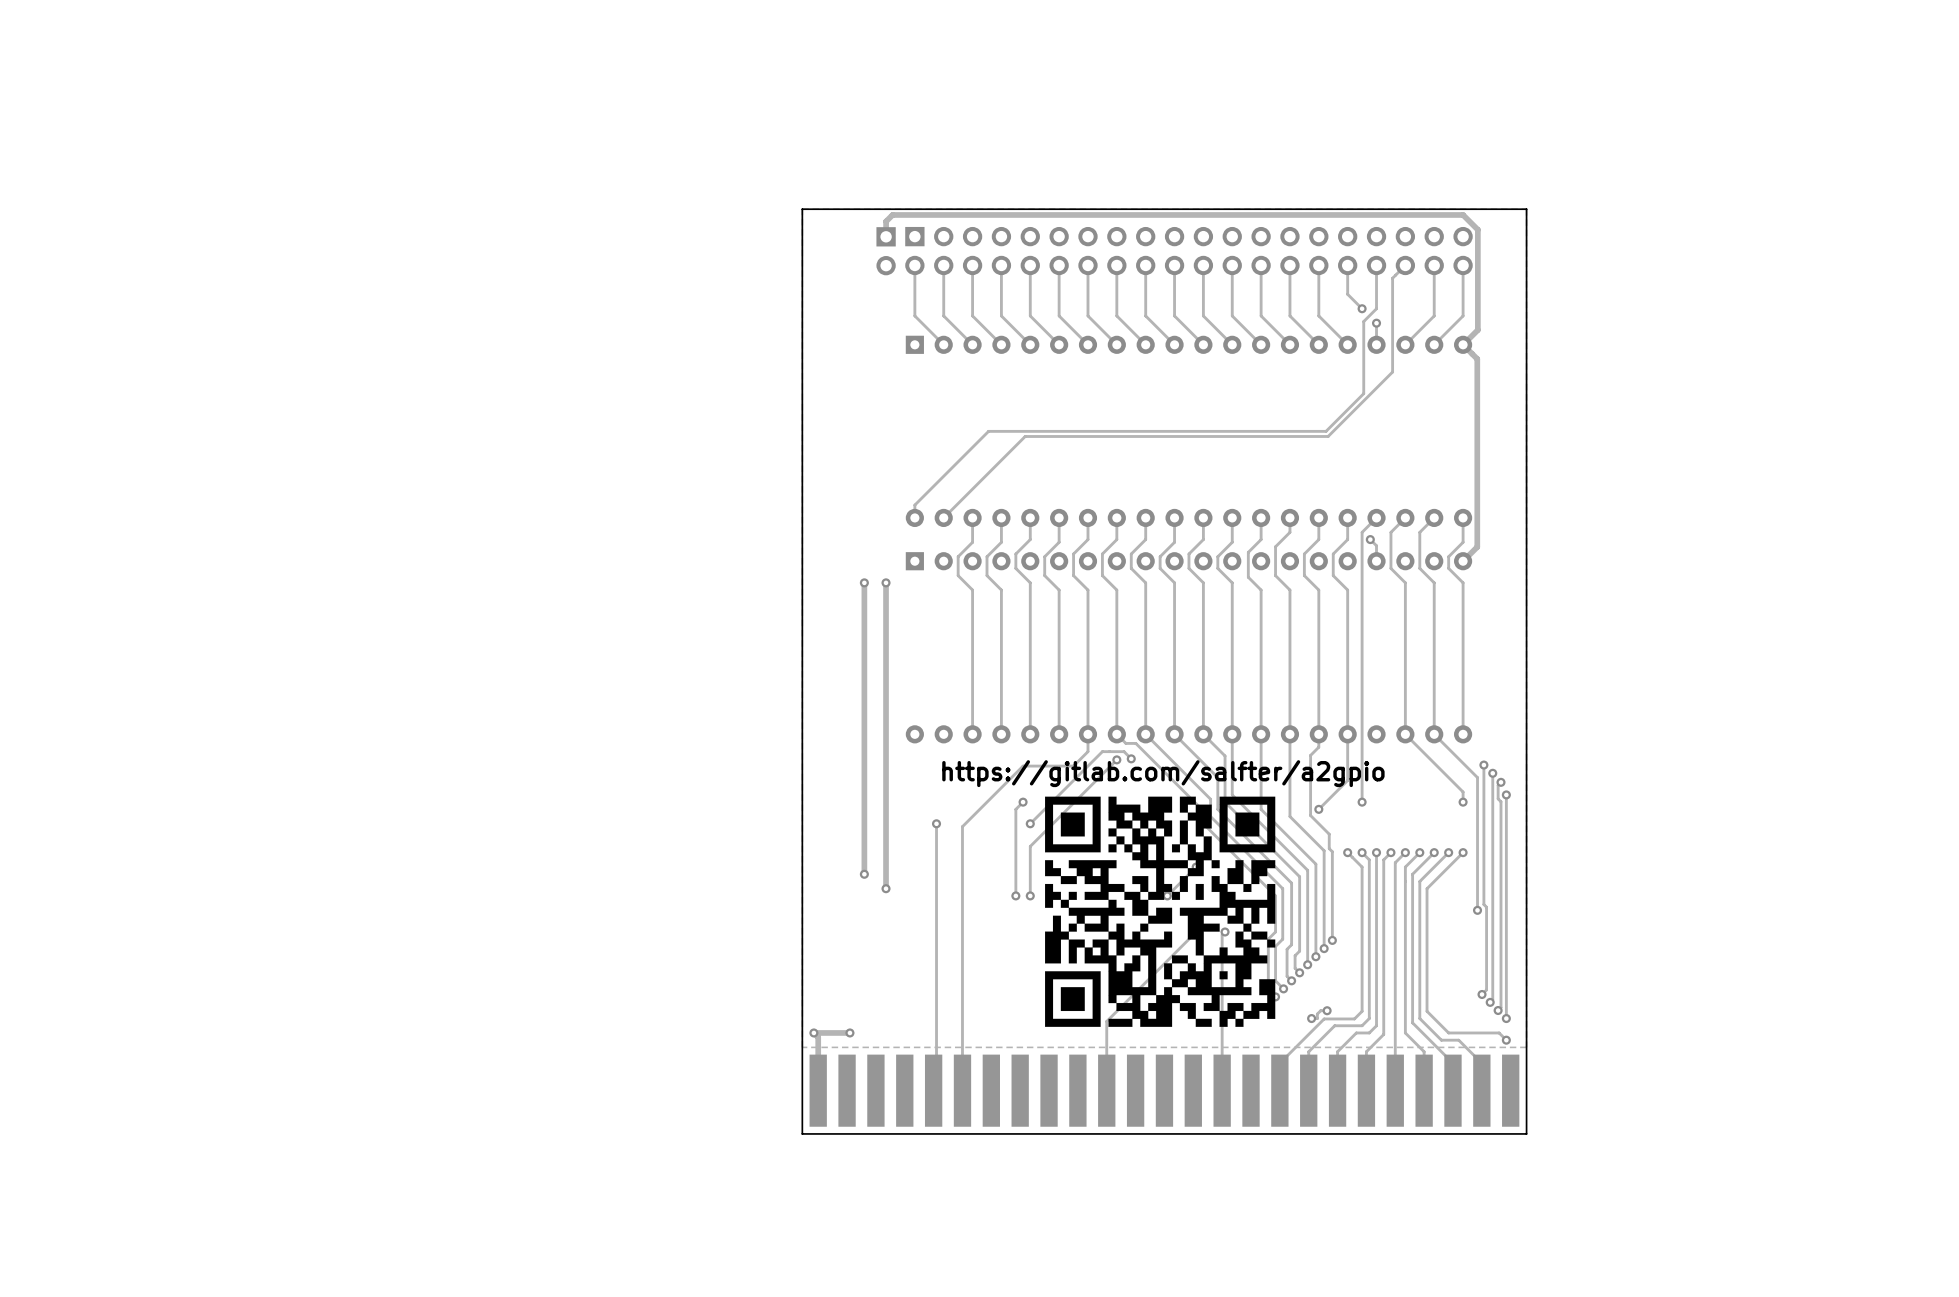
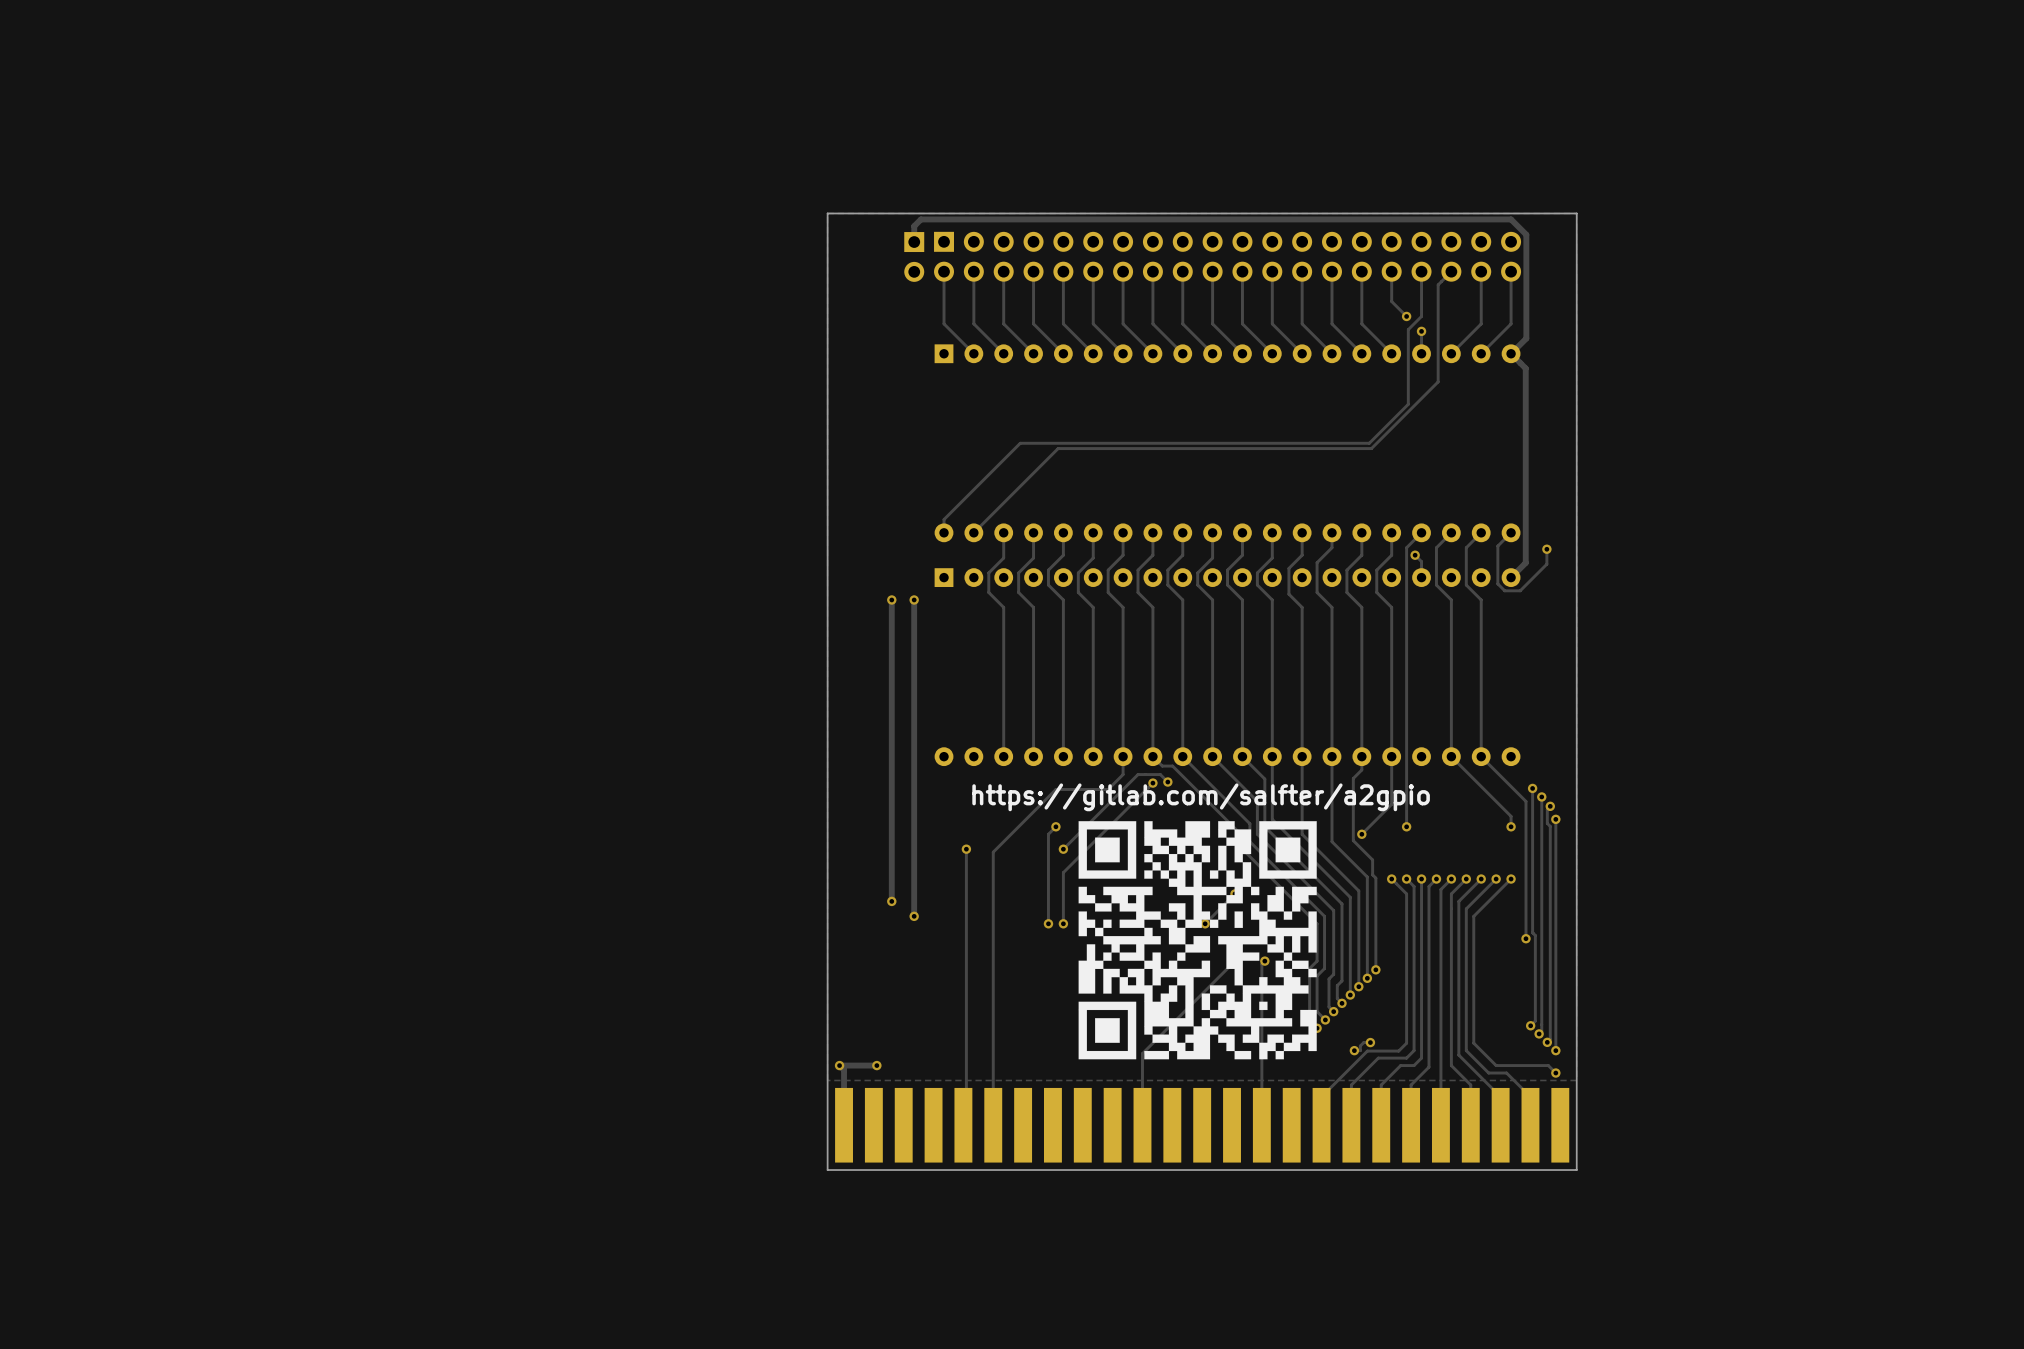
track: (1463, 517) (1463, 542) (1448, 556) (1448, 568) (1463, 582) (1463, 734) -> (1511, 532) (1497, 546) (1497, 583) (1504, 590) (1520, 590) (1546, 564) (1546, 549)
via: none -> (1546, 549)

